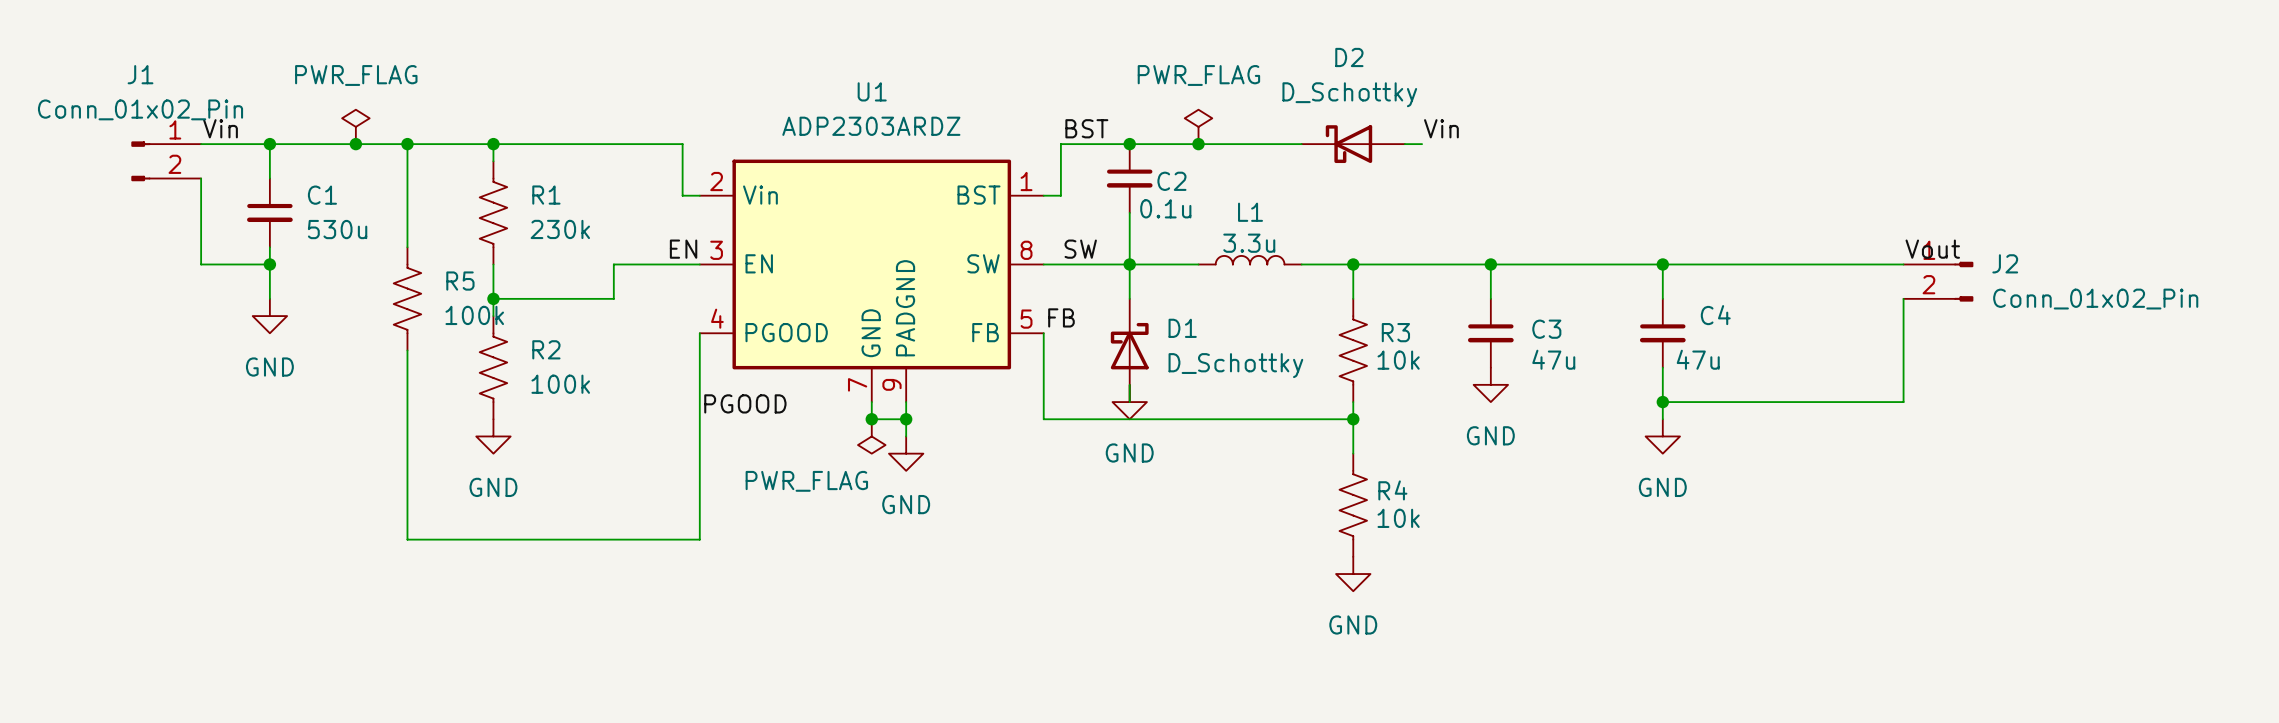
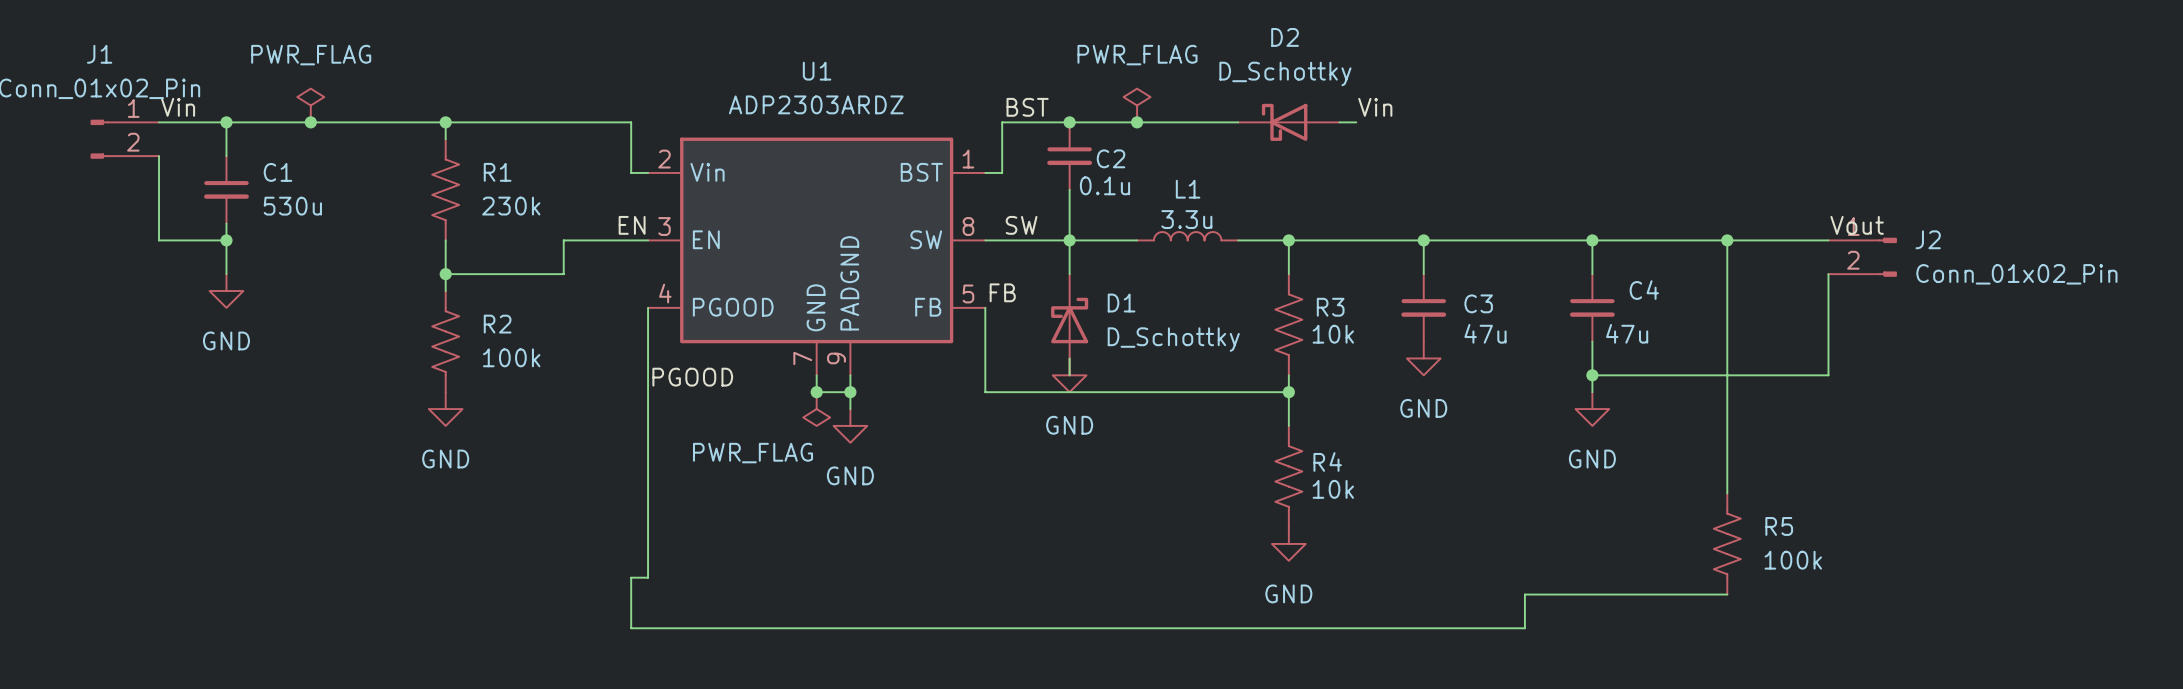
wire: (407, 144) (407, 247) -> none
junction: (407, 144) -> none
wire: none -> (1727, 240) (1727, 493)
junction: none -> (1727, 240)
R5 position: (407, 298) -> (1727, 543)
wire: (407, 350) (407, 539) (699, 539) -> (1727, 594) (1524, 594) (1524, 628) (631, 628) (631, 577) (648, 577) (648, 510)

